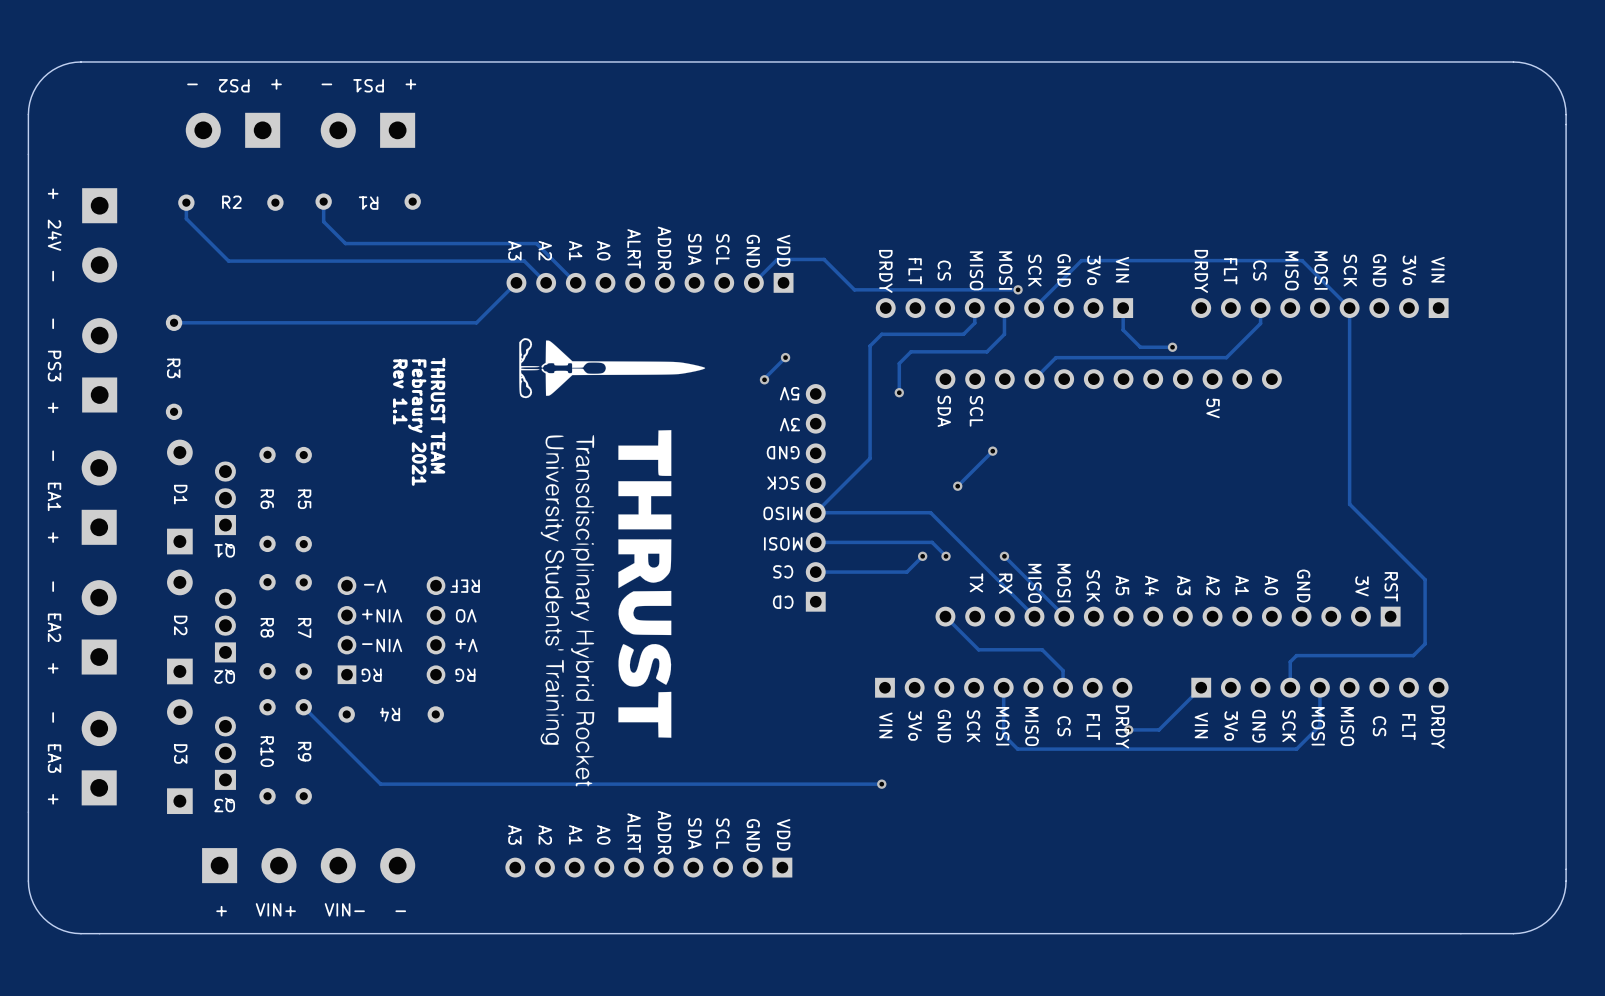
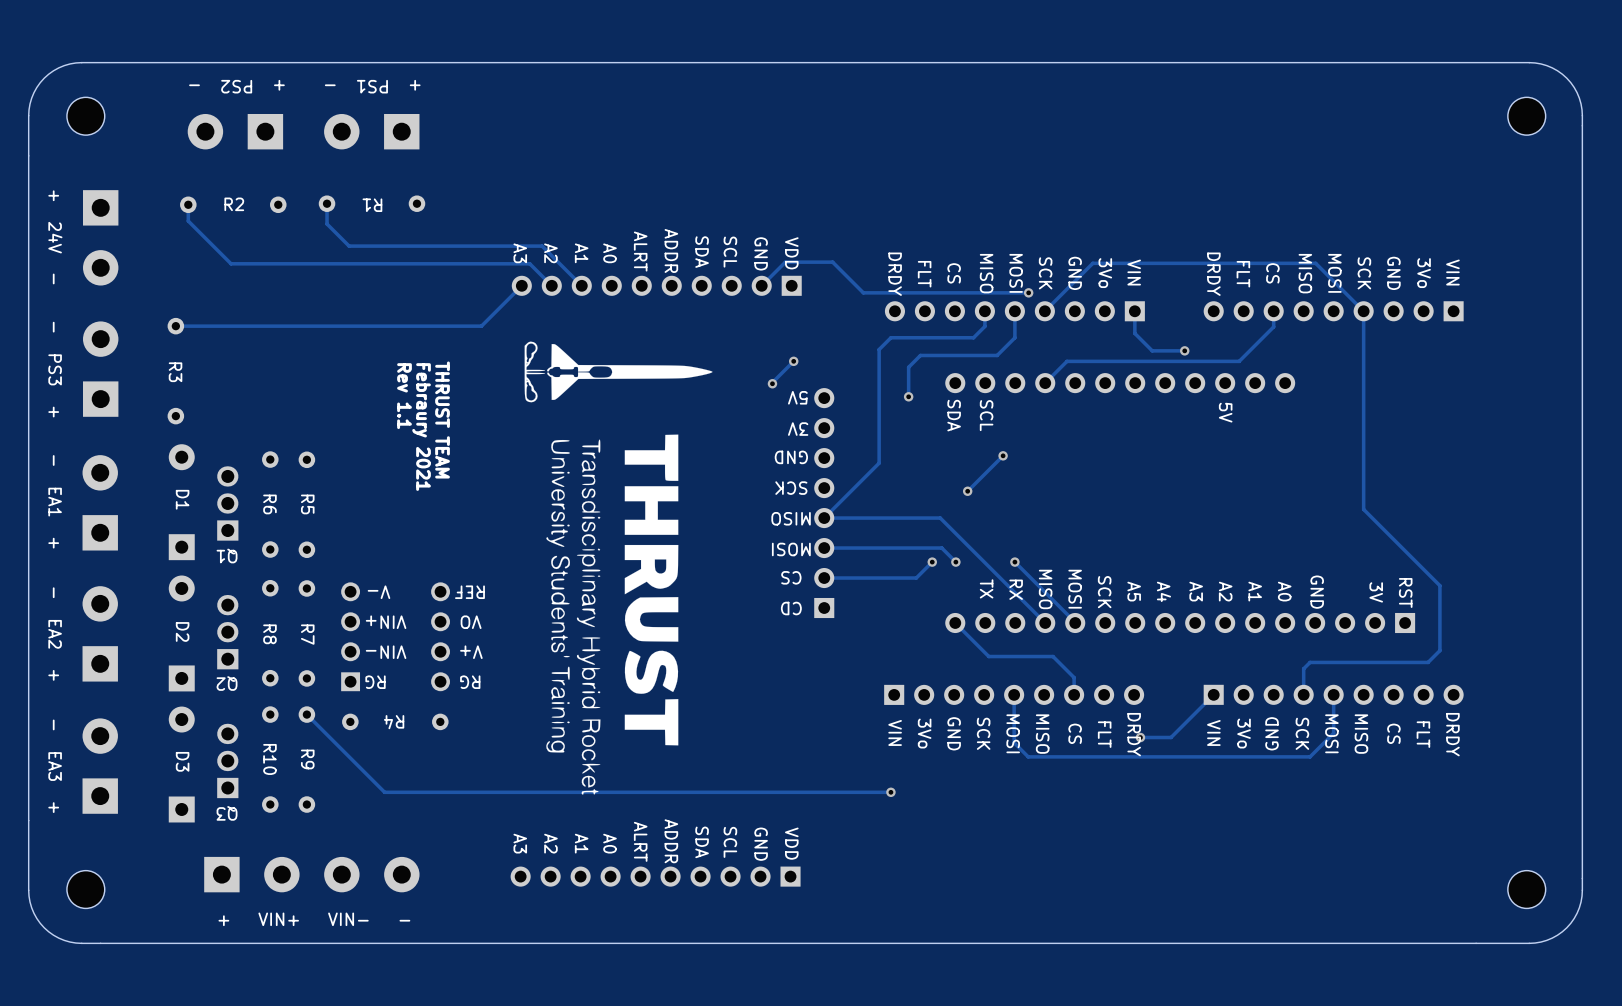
part: none -> (85, 116)
part: none -> (1526, 116)
part: none -> (85, 889)
part: none -> (1526, 889)

